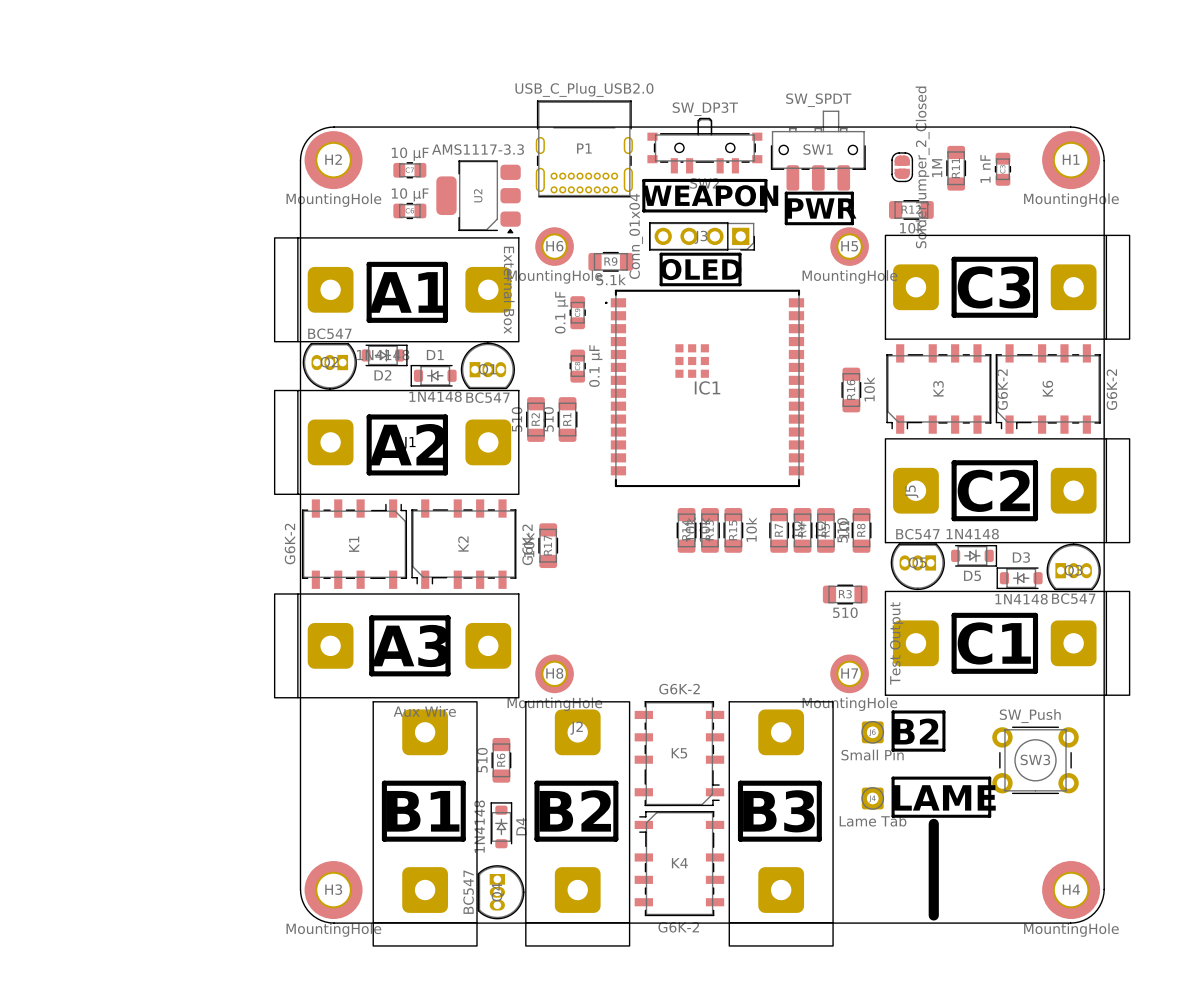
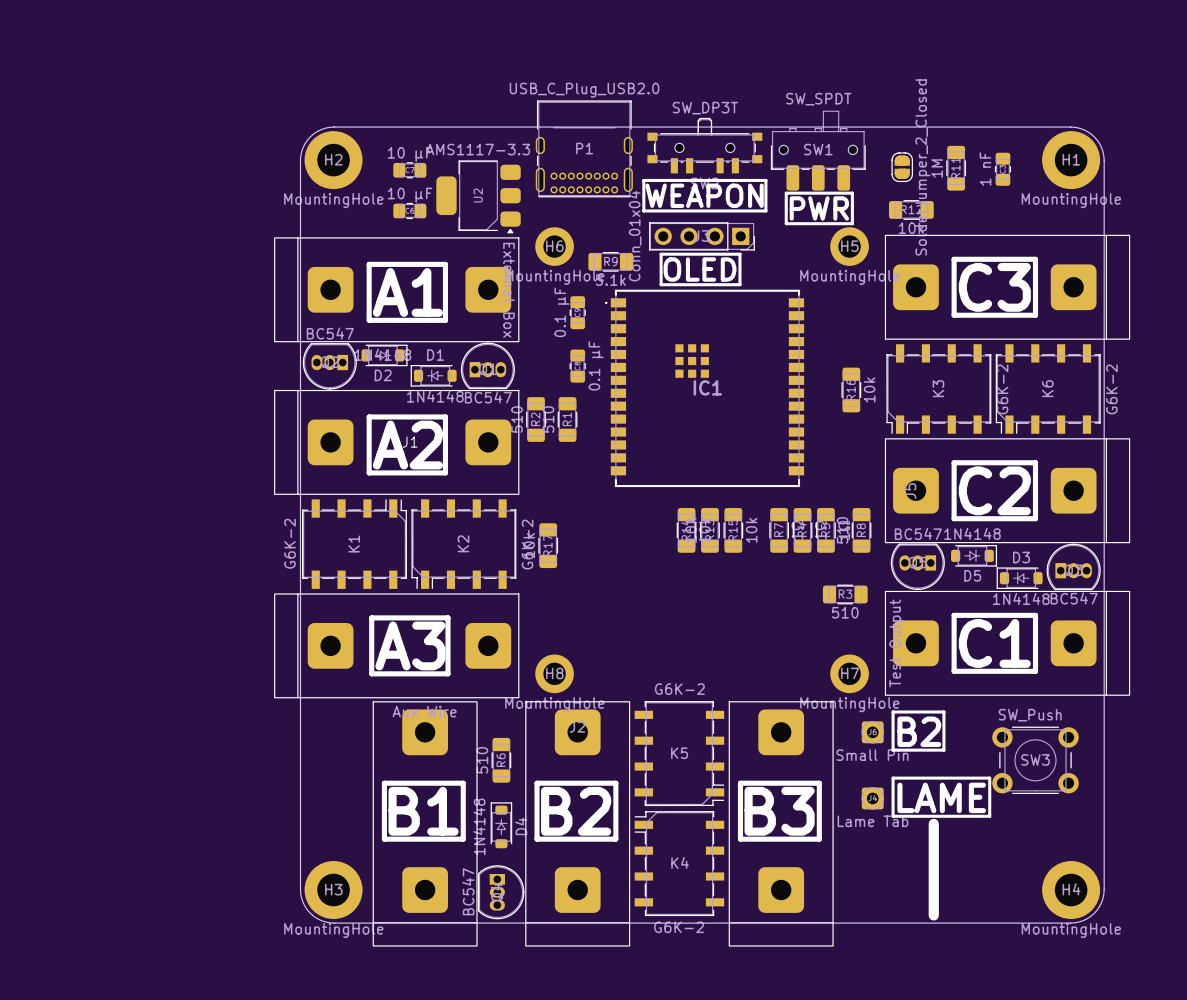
K3 footprint: [886, 344, 992, 434] -> [886, 344, 992, 434]
K6 footprint: [995, 344, 1101, 434] -> [995, 344, 1101, 434]
K1 footprint: [302, 499, 408, 589] -> [302, 499, 408, 589]
K2 footprint: [411, 499, 517, 589] -> [411, 499, 517, 590]
K5 footprint: [634, 701, 725, 807] -> [634, 701, 725, 807]
K4 footprint: [634, 811, 725, 917] -> [634, 811, 725, 917]

